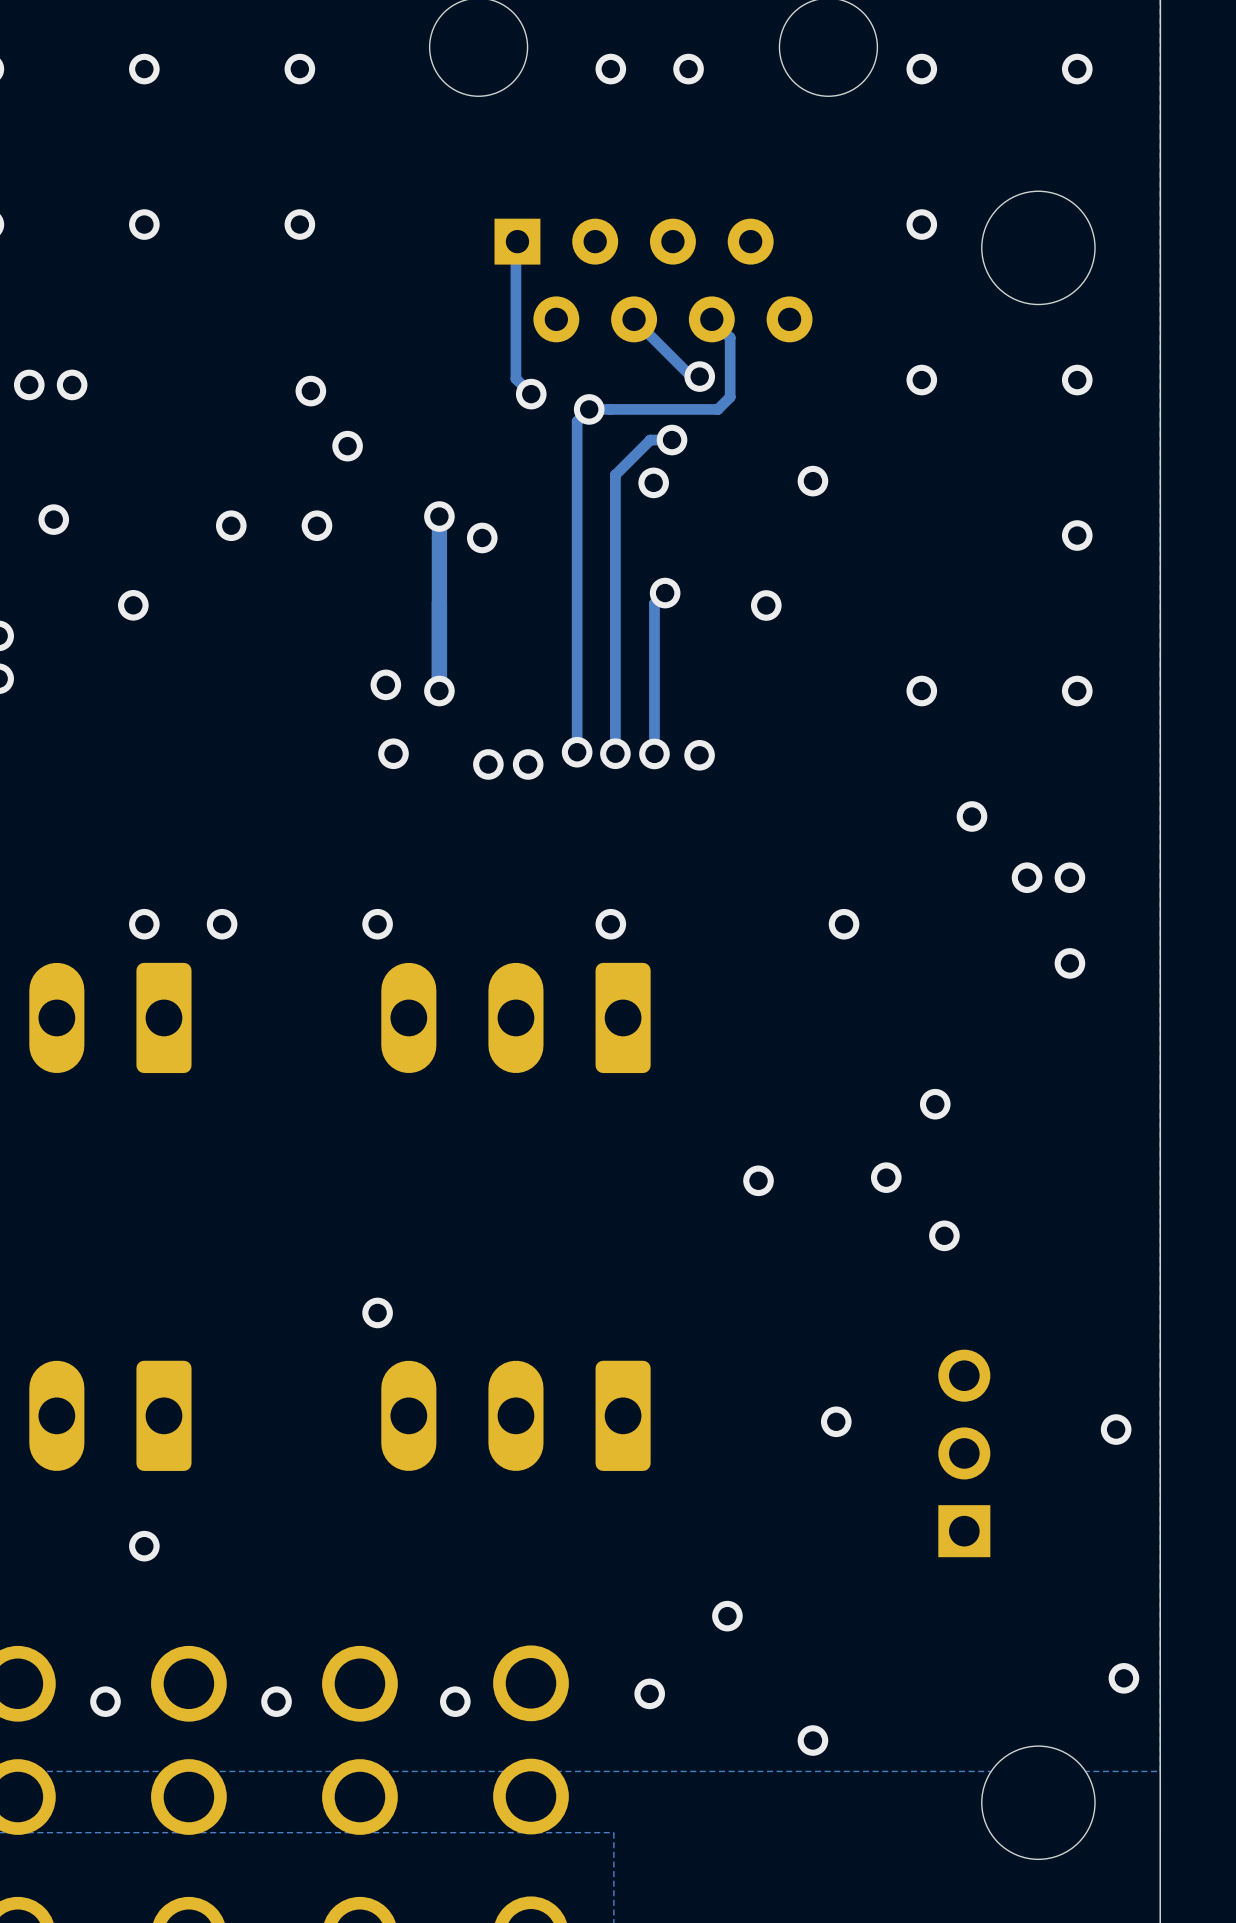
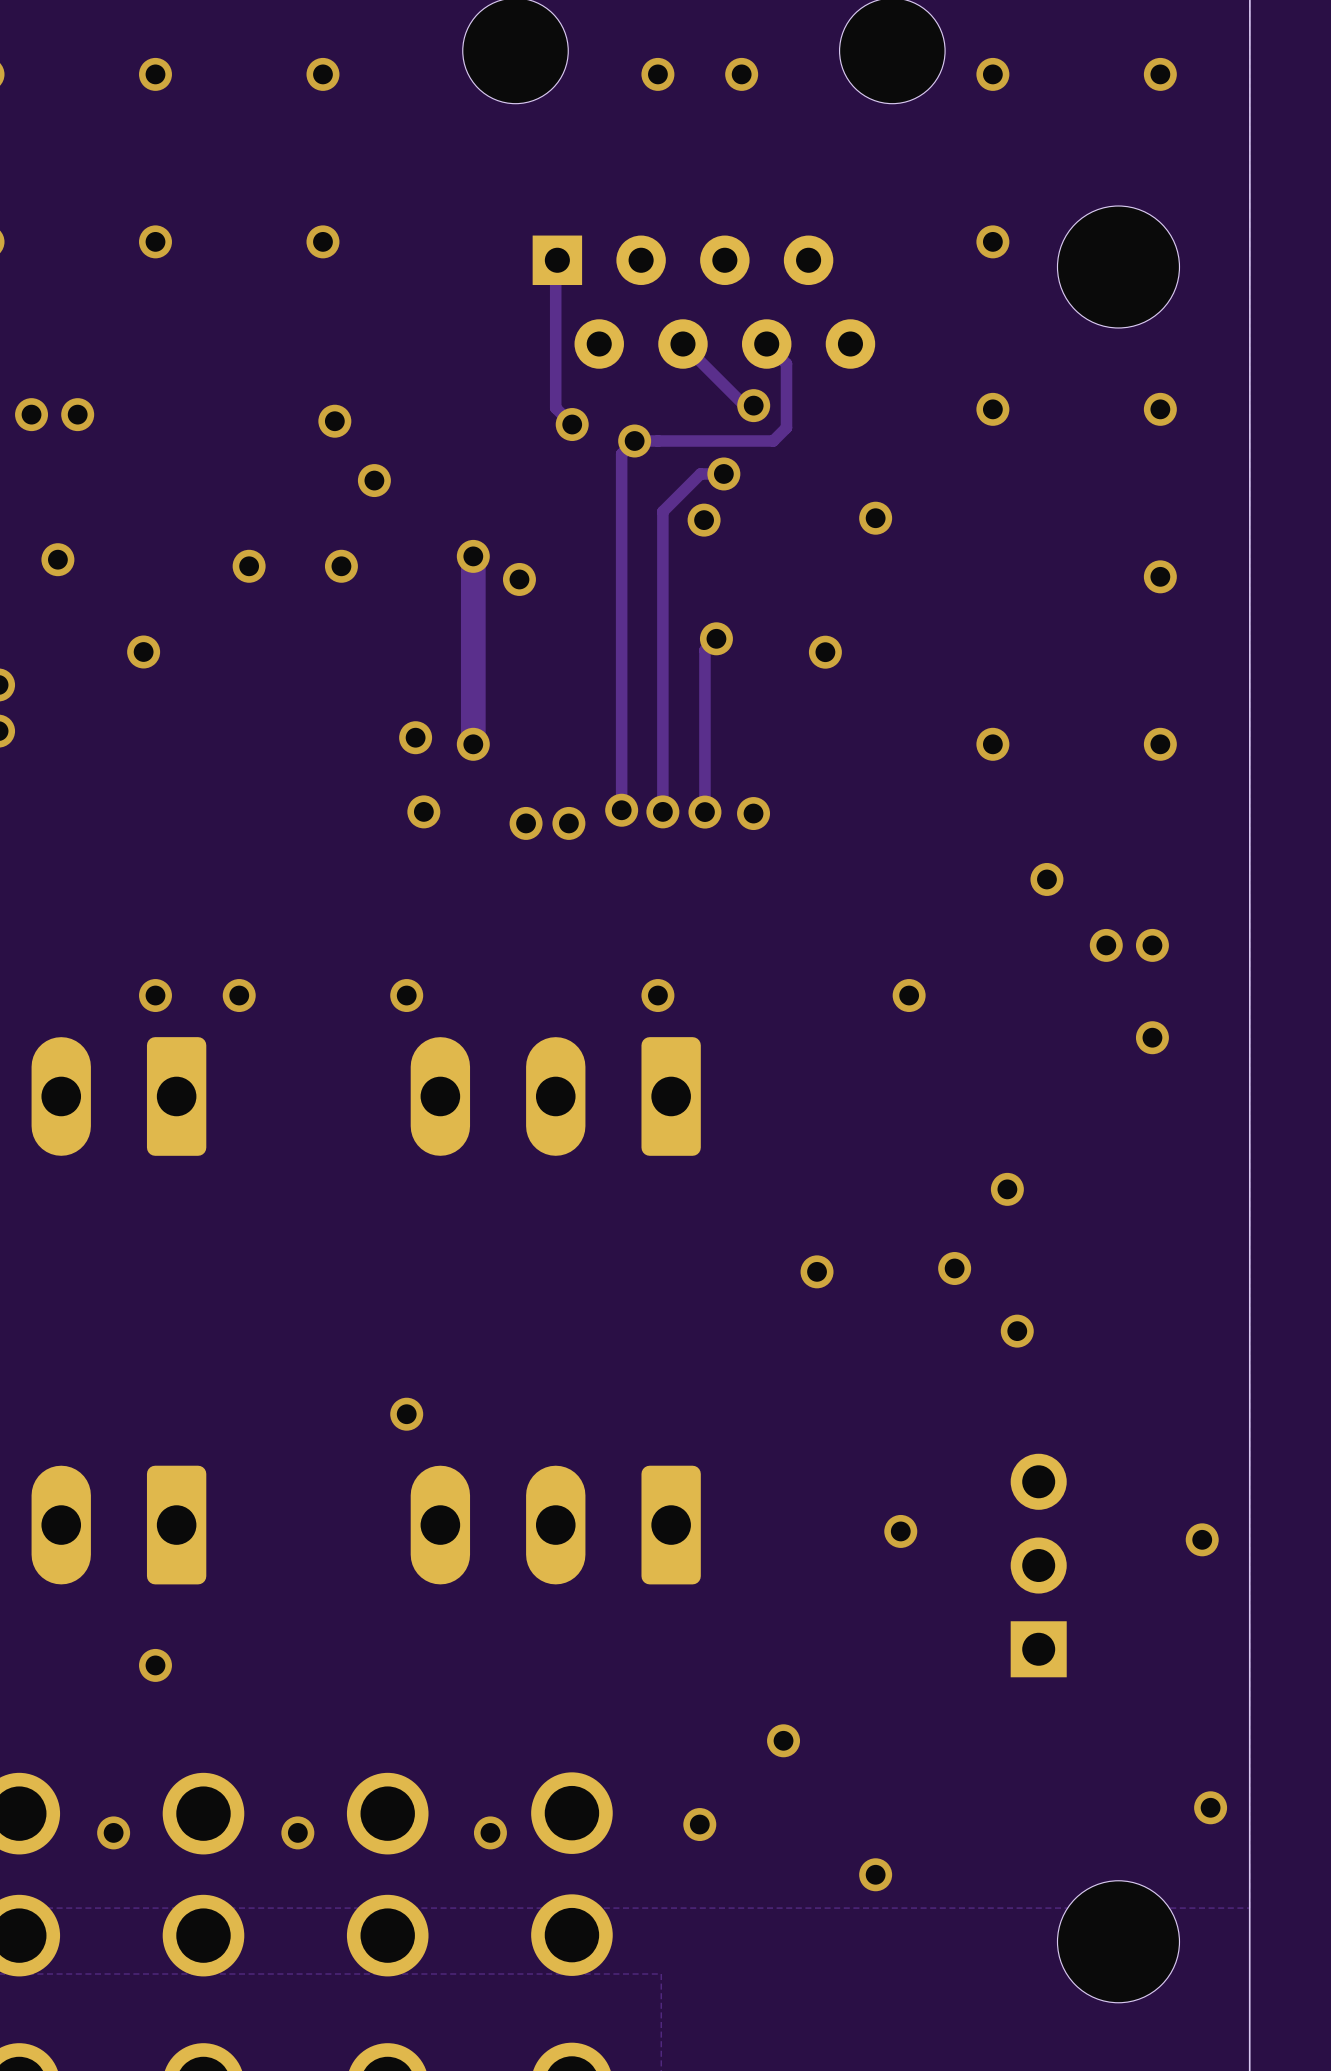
track width: thin (439, 516) (439, 691) -> thick (473, 556) (473, 744)

